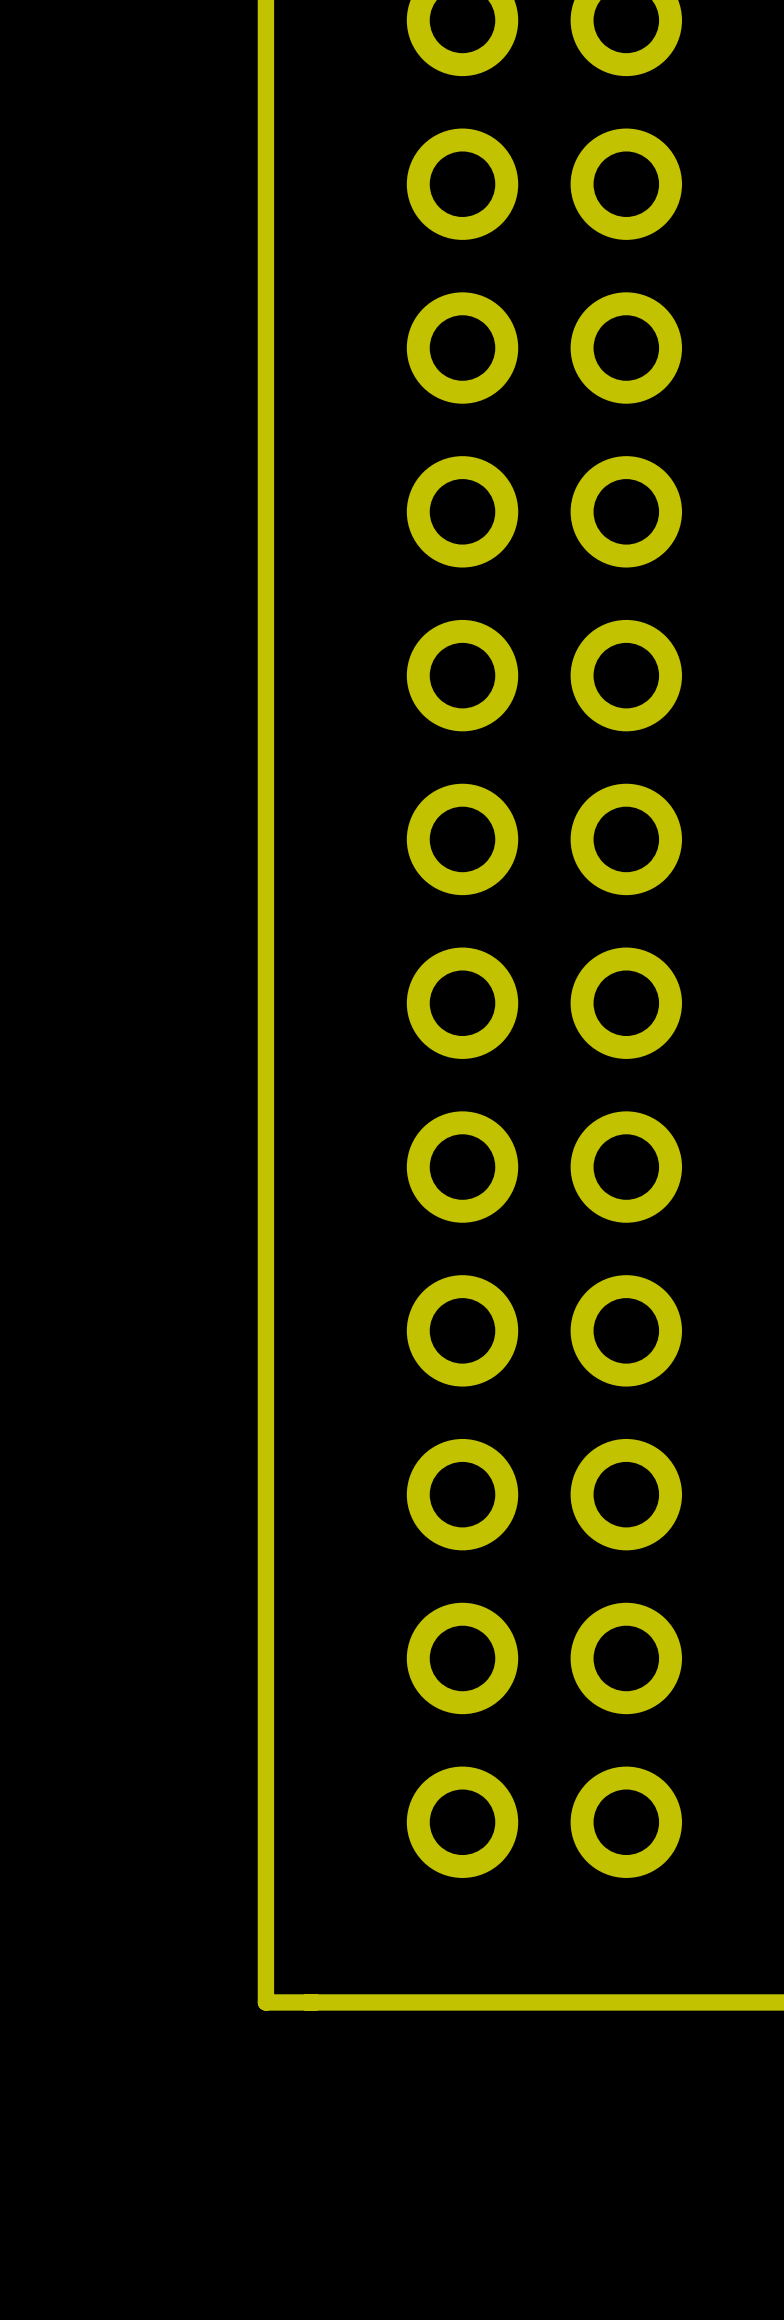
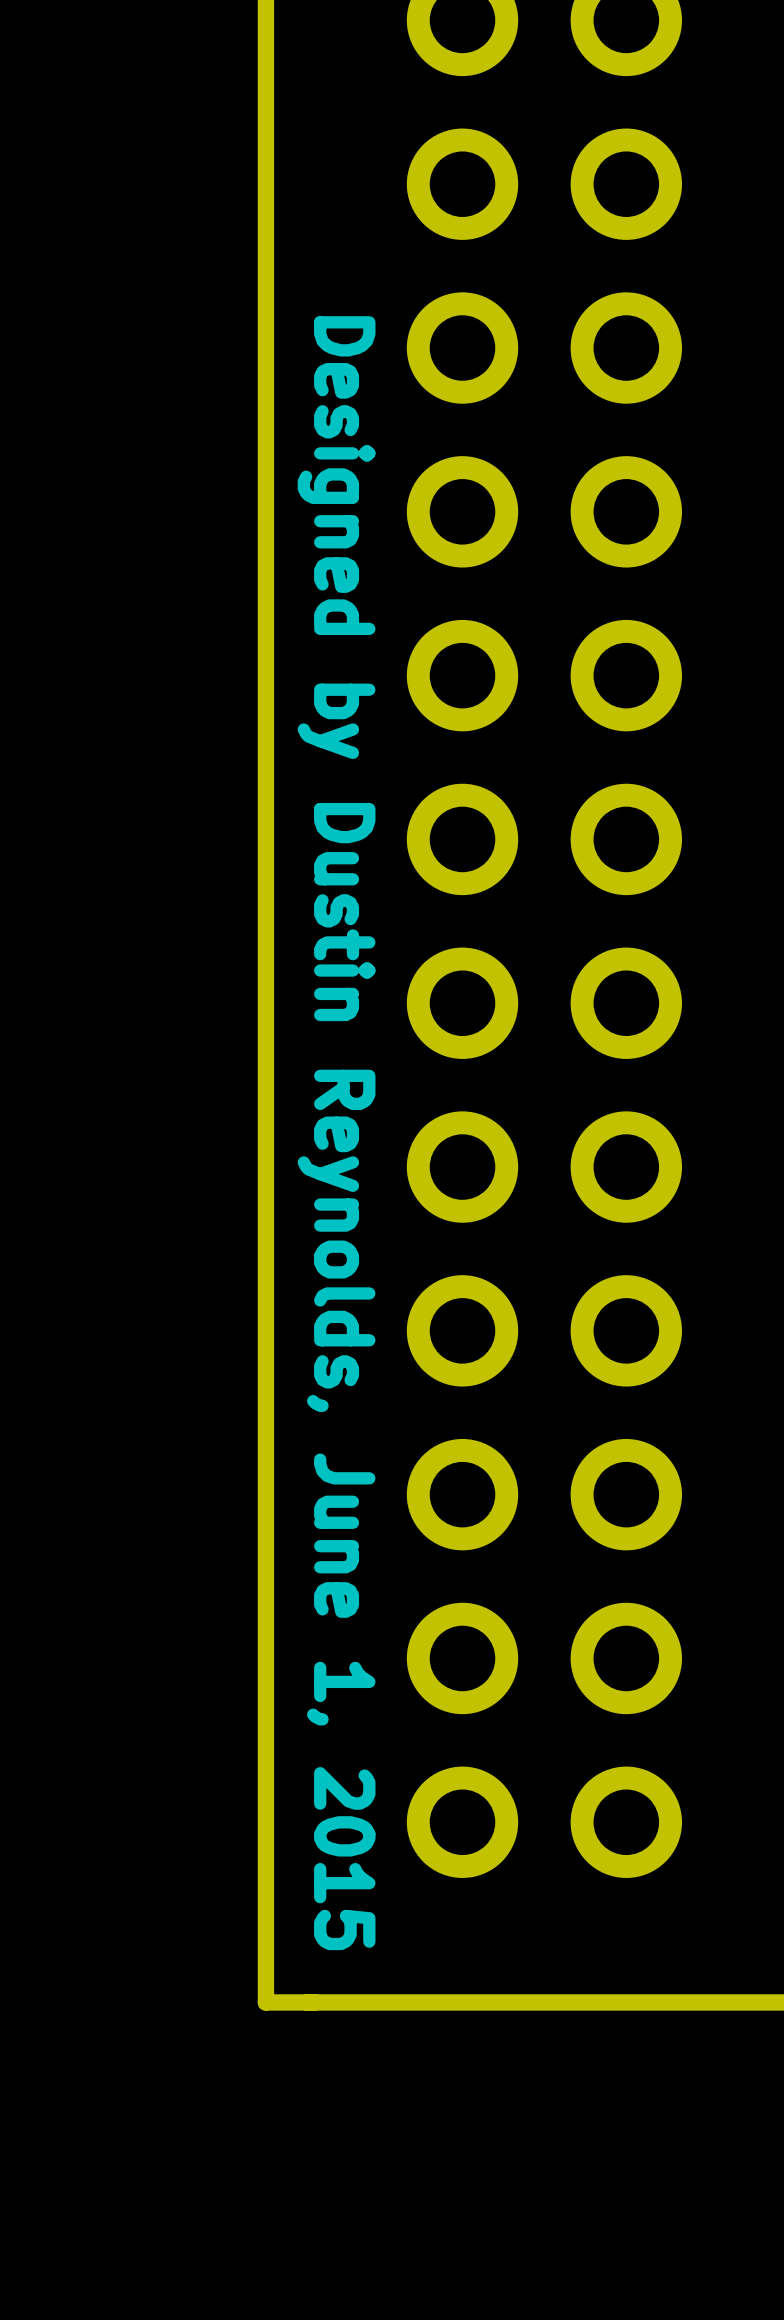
text: none -> Designed by Dustin Reynolds, June 1, 2015 (336, 1133)

